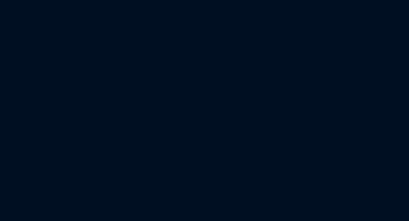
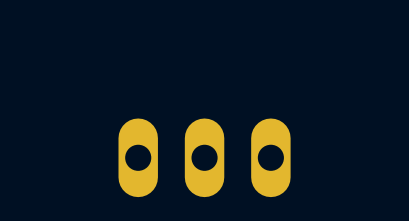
part: none -> (204, 157)

